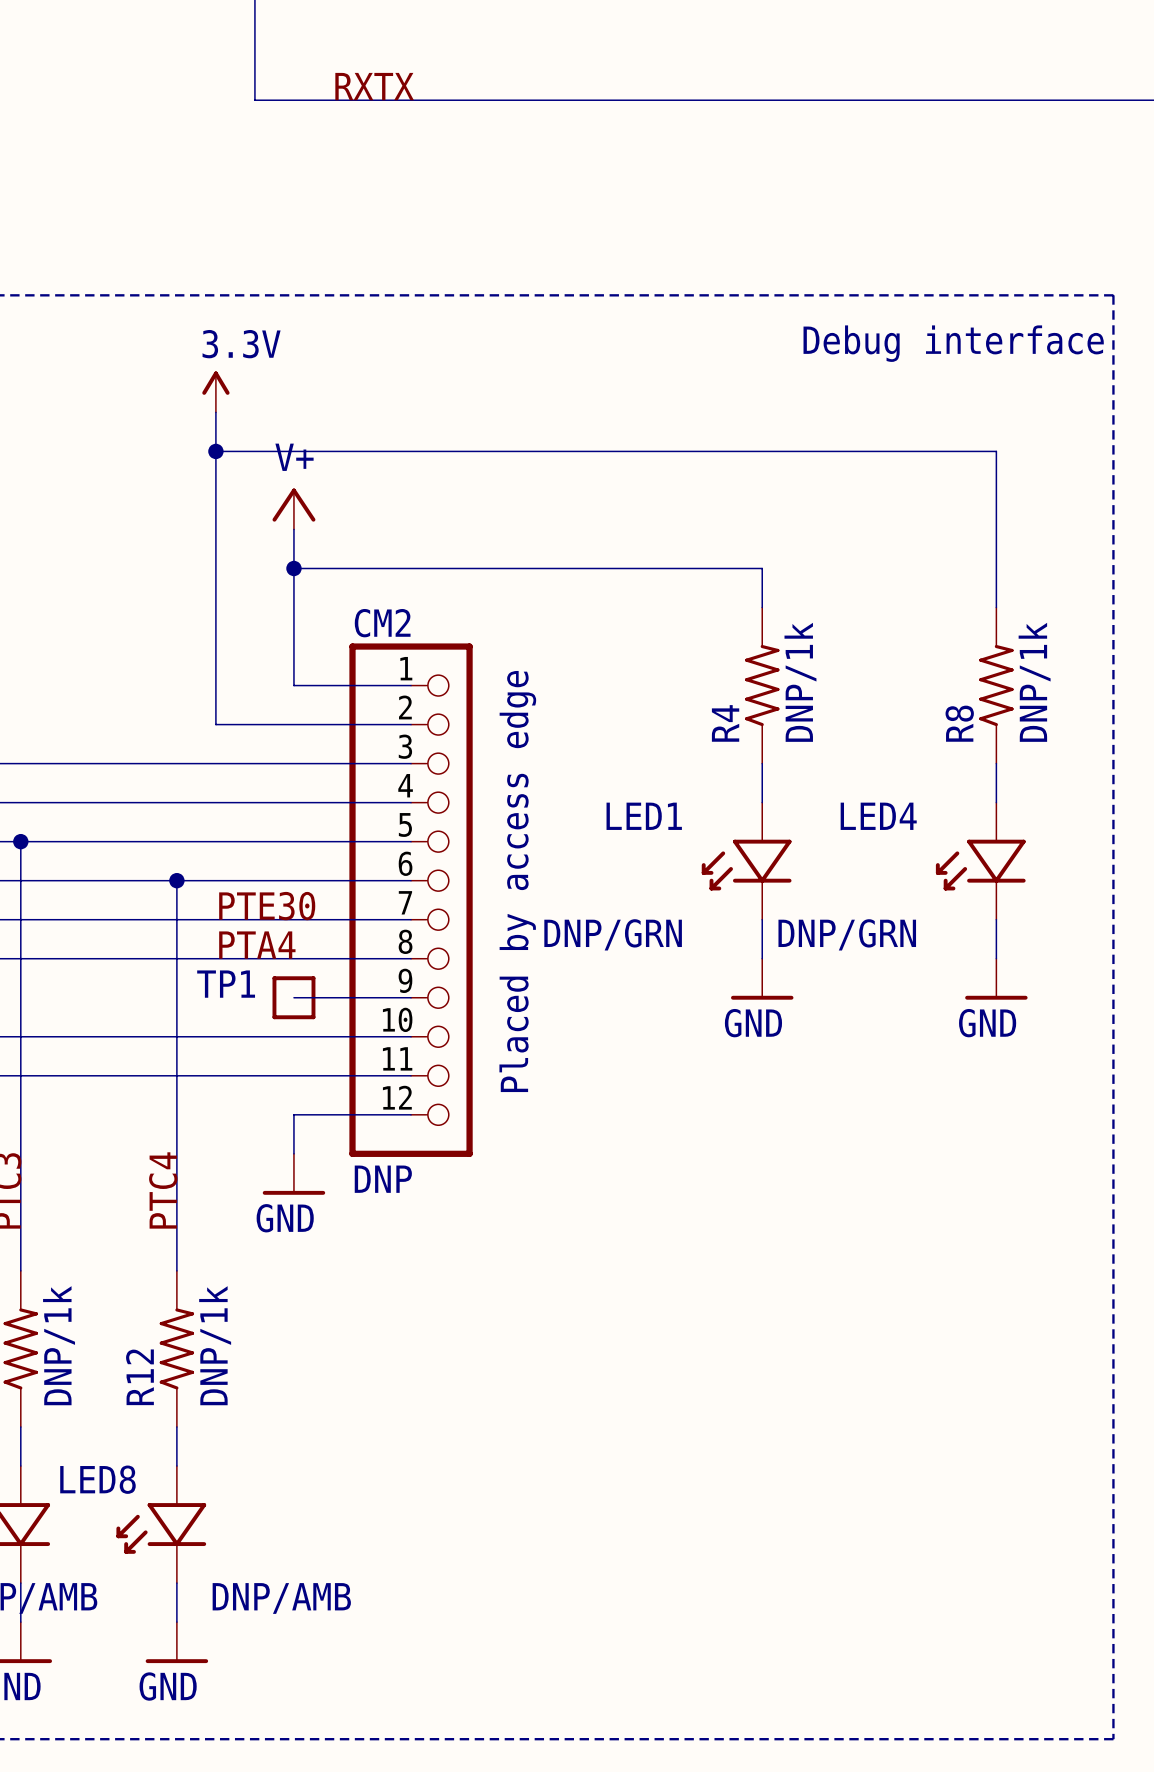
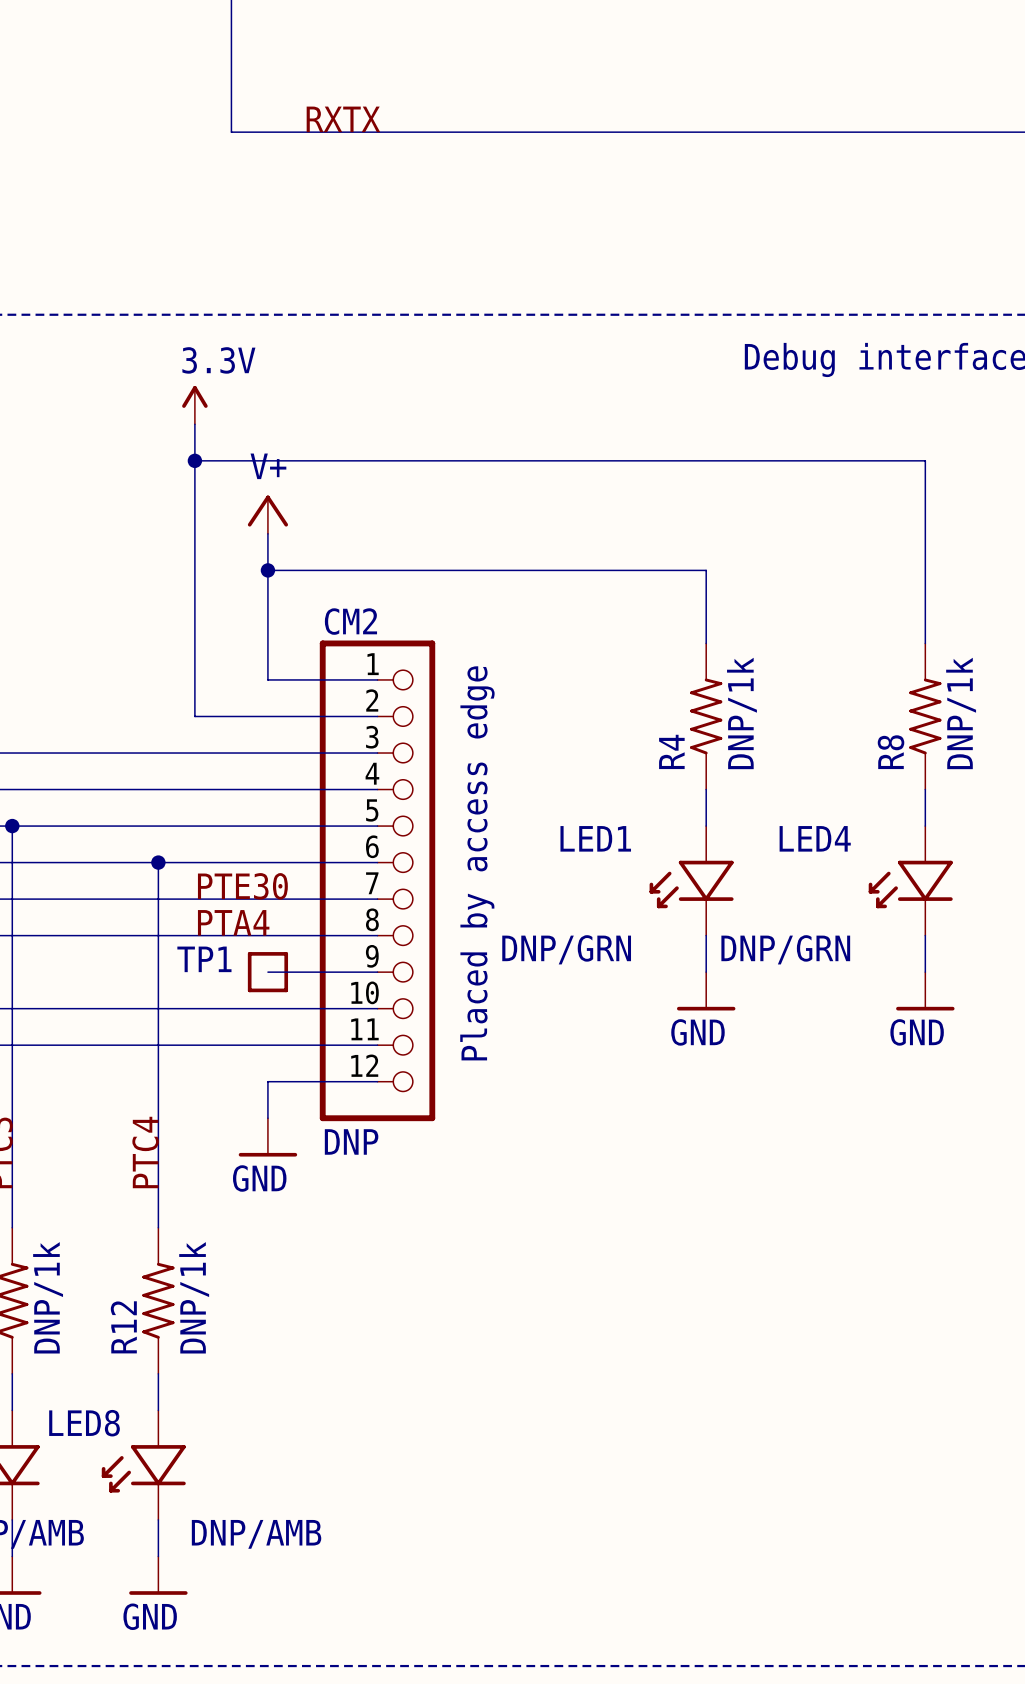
R4 position: (762, 685) -> (706, 716)
R8 position: (996, 685) -> (925, 716)
LED1 position: (746, 861) -> (691, 880)
LED4 position: (980, 861) -> (910, 880)
power symbol position: GND (762, 979) -> GND (706, 991)
power symbol position: GND (996, 979) -> GND (925, 991)

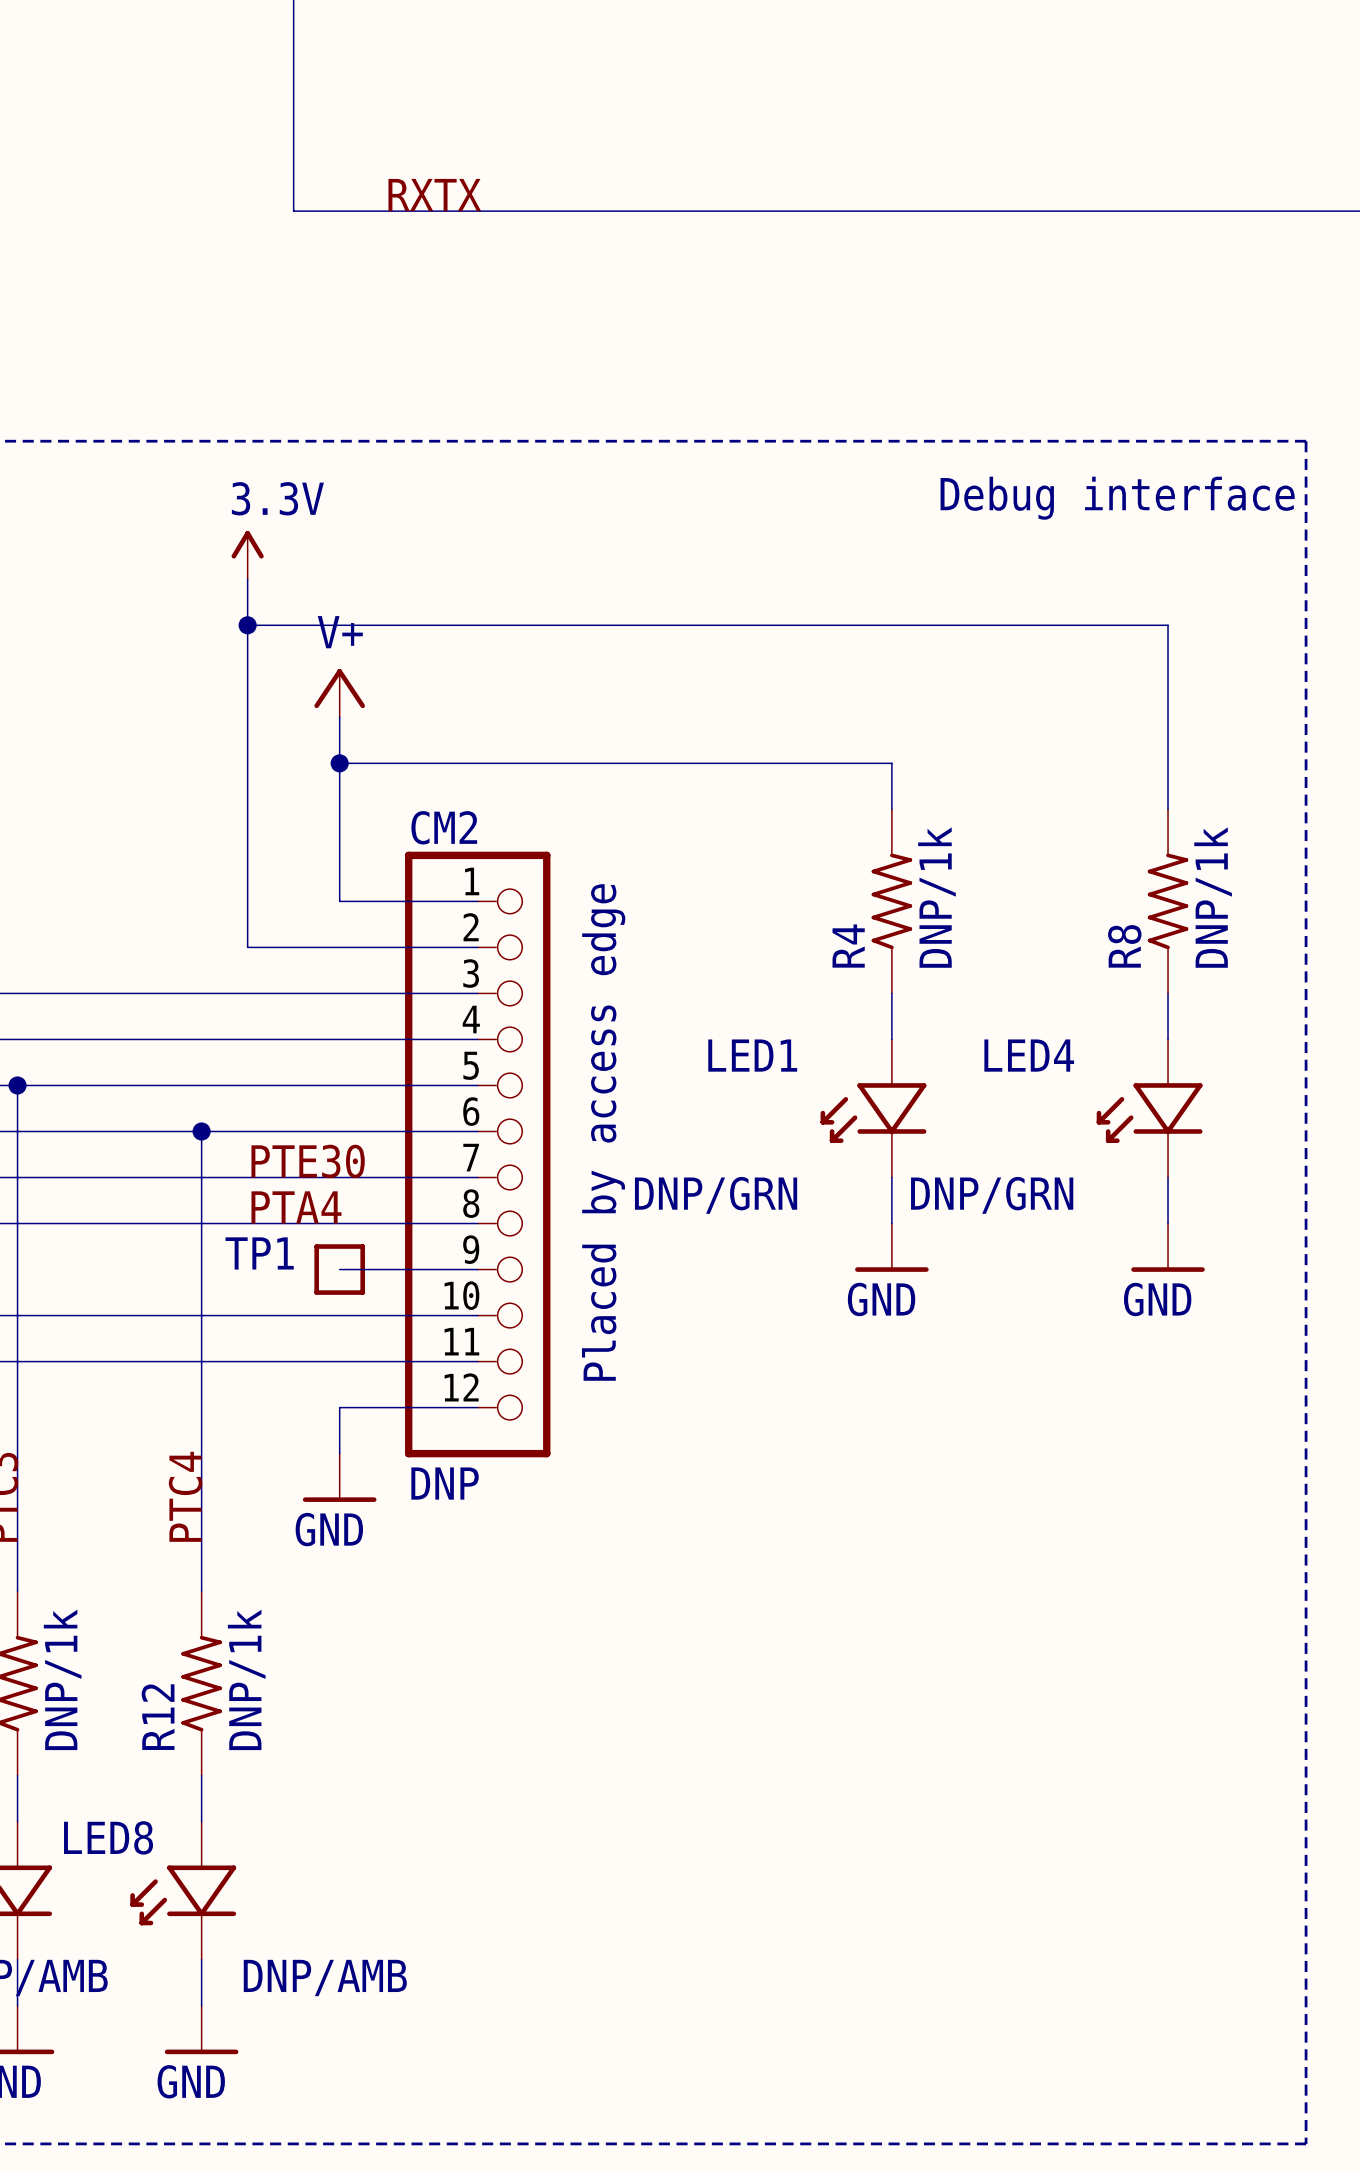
R4 position: (706, 716) -> (891, 901)
R8 position: (925, 716) -> (1168, 901)
LED1 position: (691, 880) -> (873, 1108)
LED4 position: (910, 880) -> (1149, 1108)
power symbol position: GND (706, 991) -> GND (891, 1247)
power symbol position: GND (925, 991) -> GND (1168, 1247)

